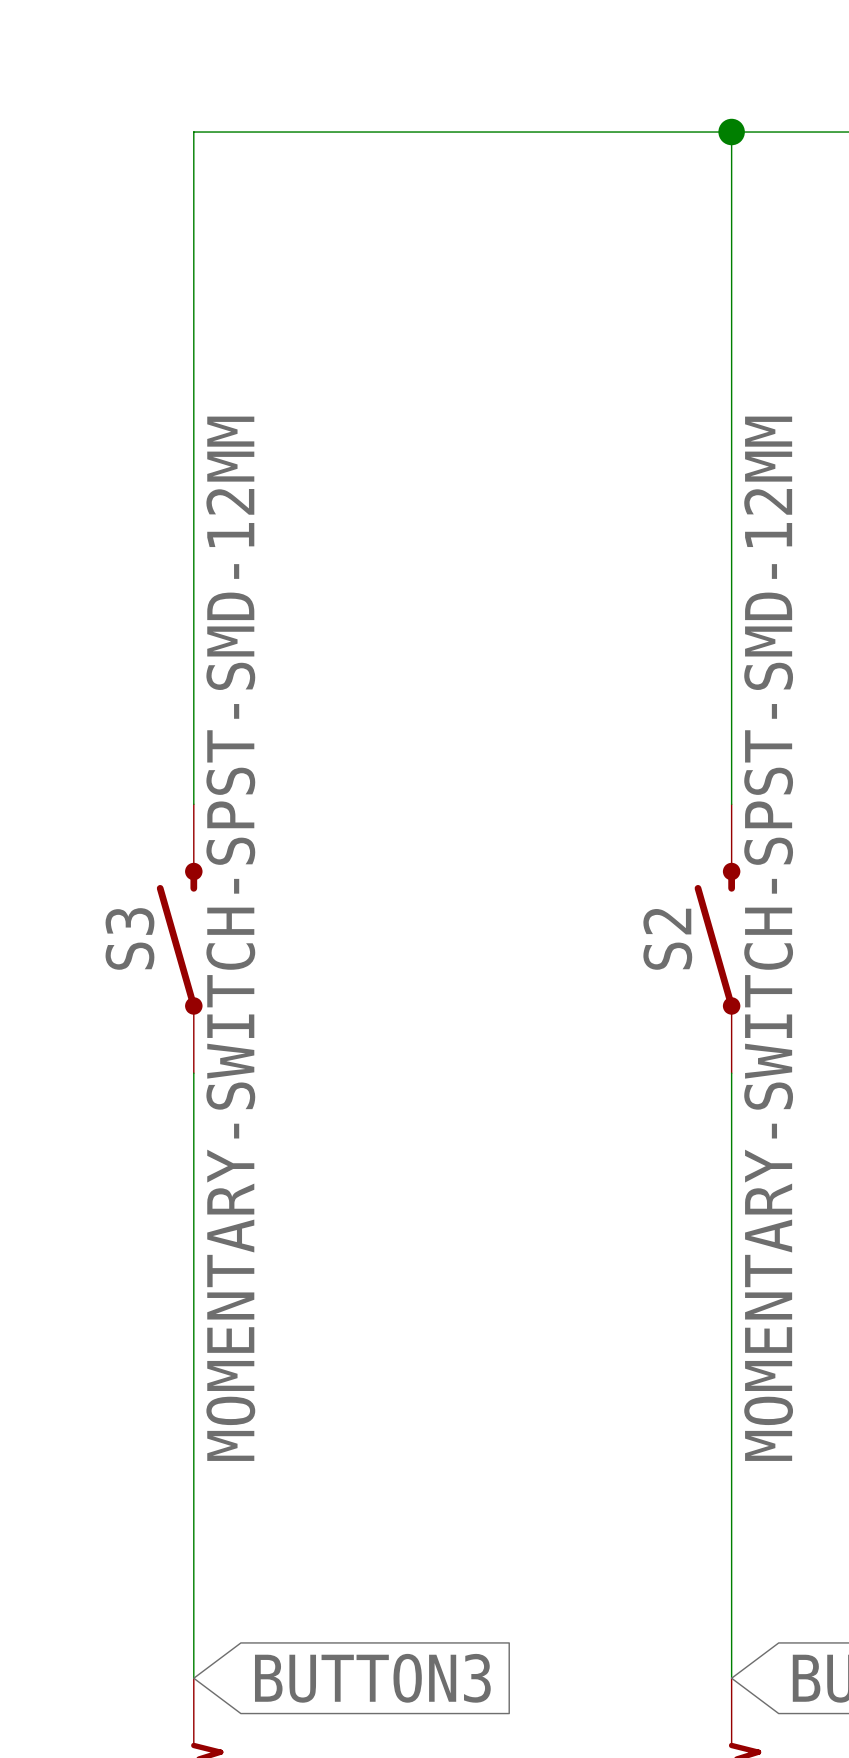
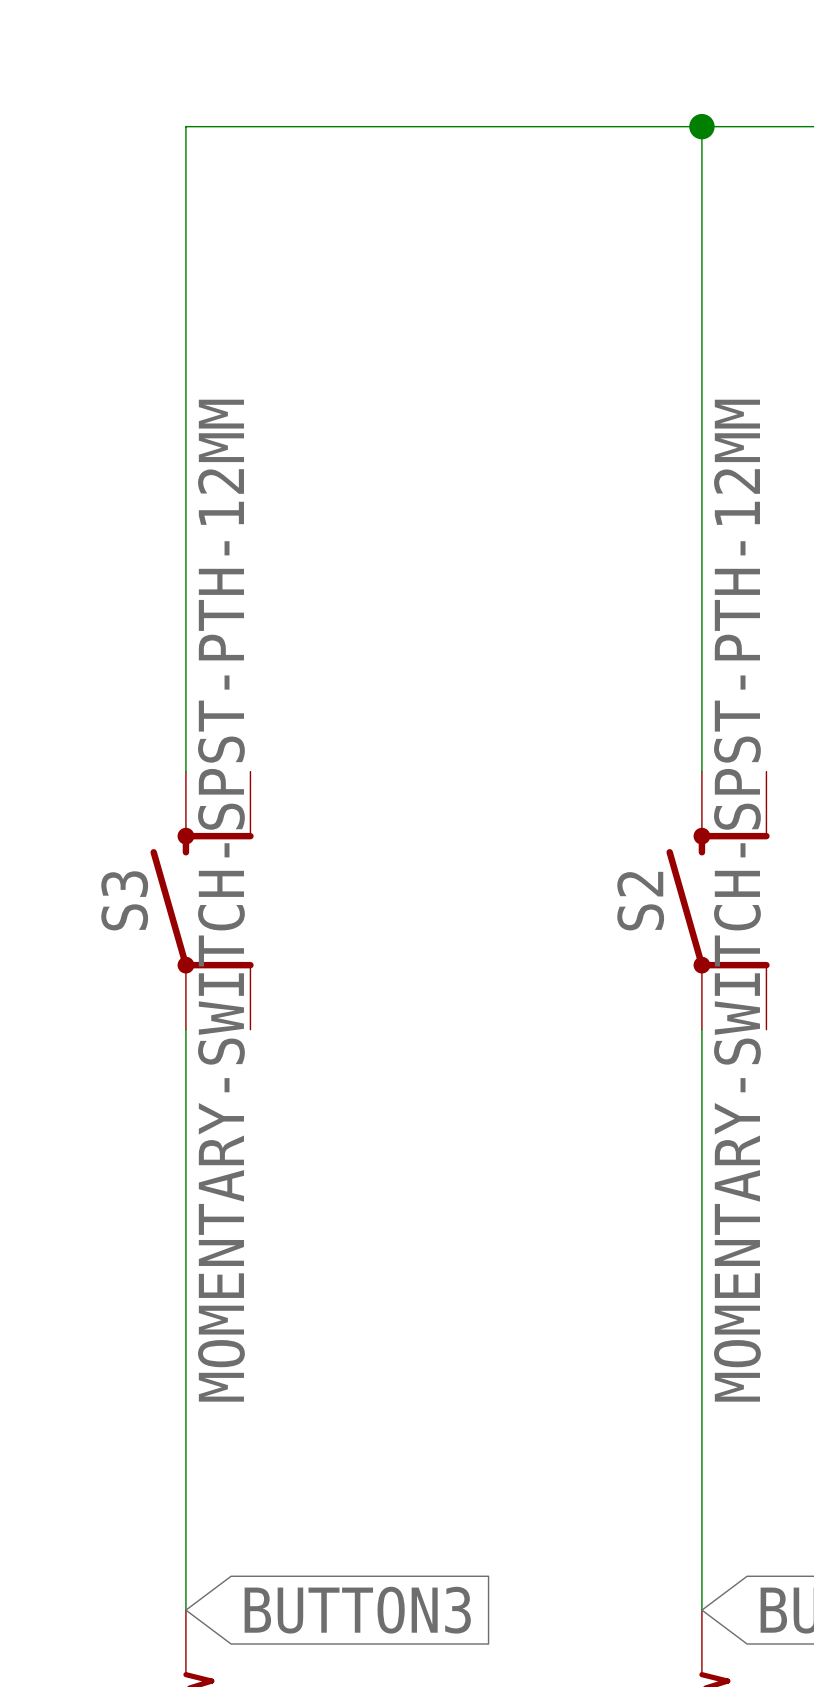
S3 symbol: [156, 804, 203, 1074] -> [150, 771, 254, 1030]
S2 symbol: [694, 804, 741, 1074] -> [666, 771, 770, 1030]
S3 value: MOMENTARY-SWITCH-SPST-SMD-12MM (230, 938) -> MOMENTARY-SWITCH-SPST-PTH-12MM (221, 900)
S2 value: MOMENTARY-SWITCH-SPST-SMD-12MM (768, 938) -> MOMENTARY-SWITCH-SPST-PTH-12MM (737, 900)

